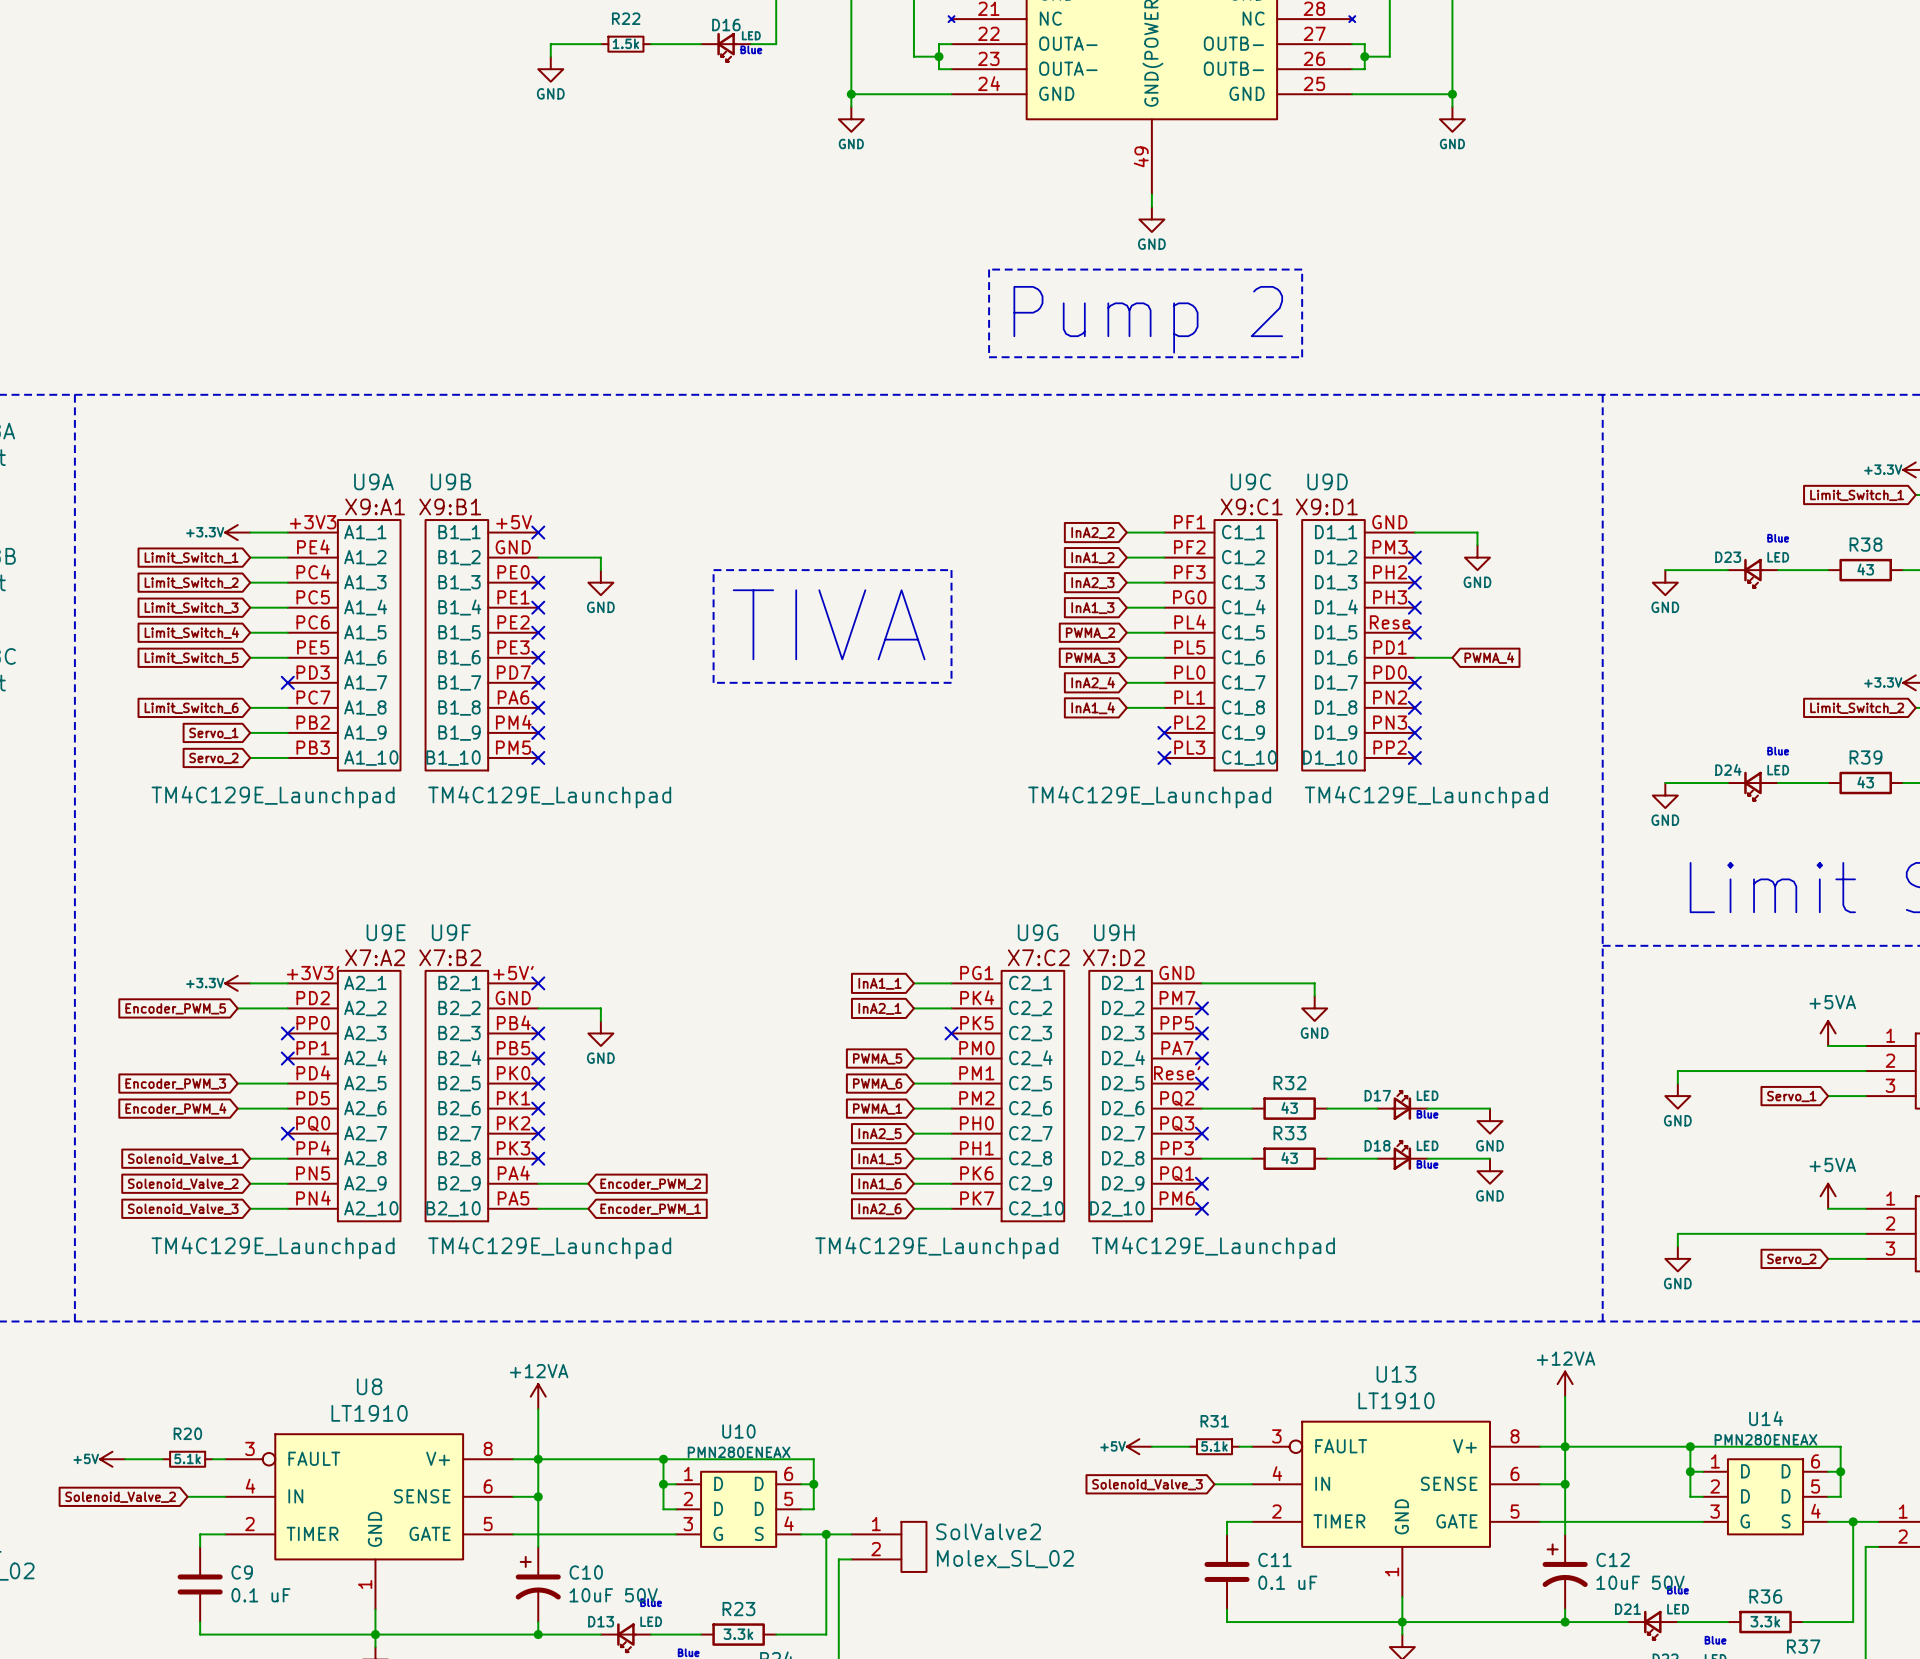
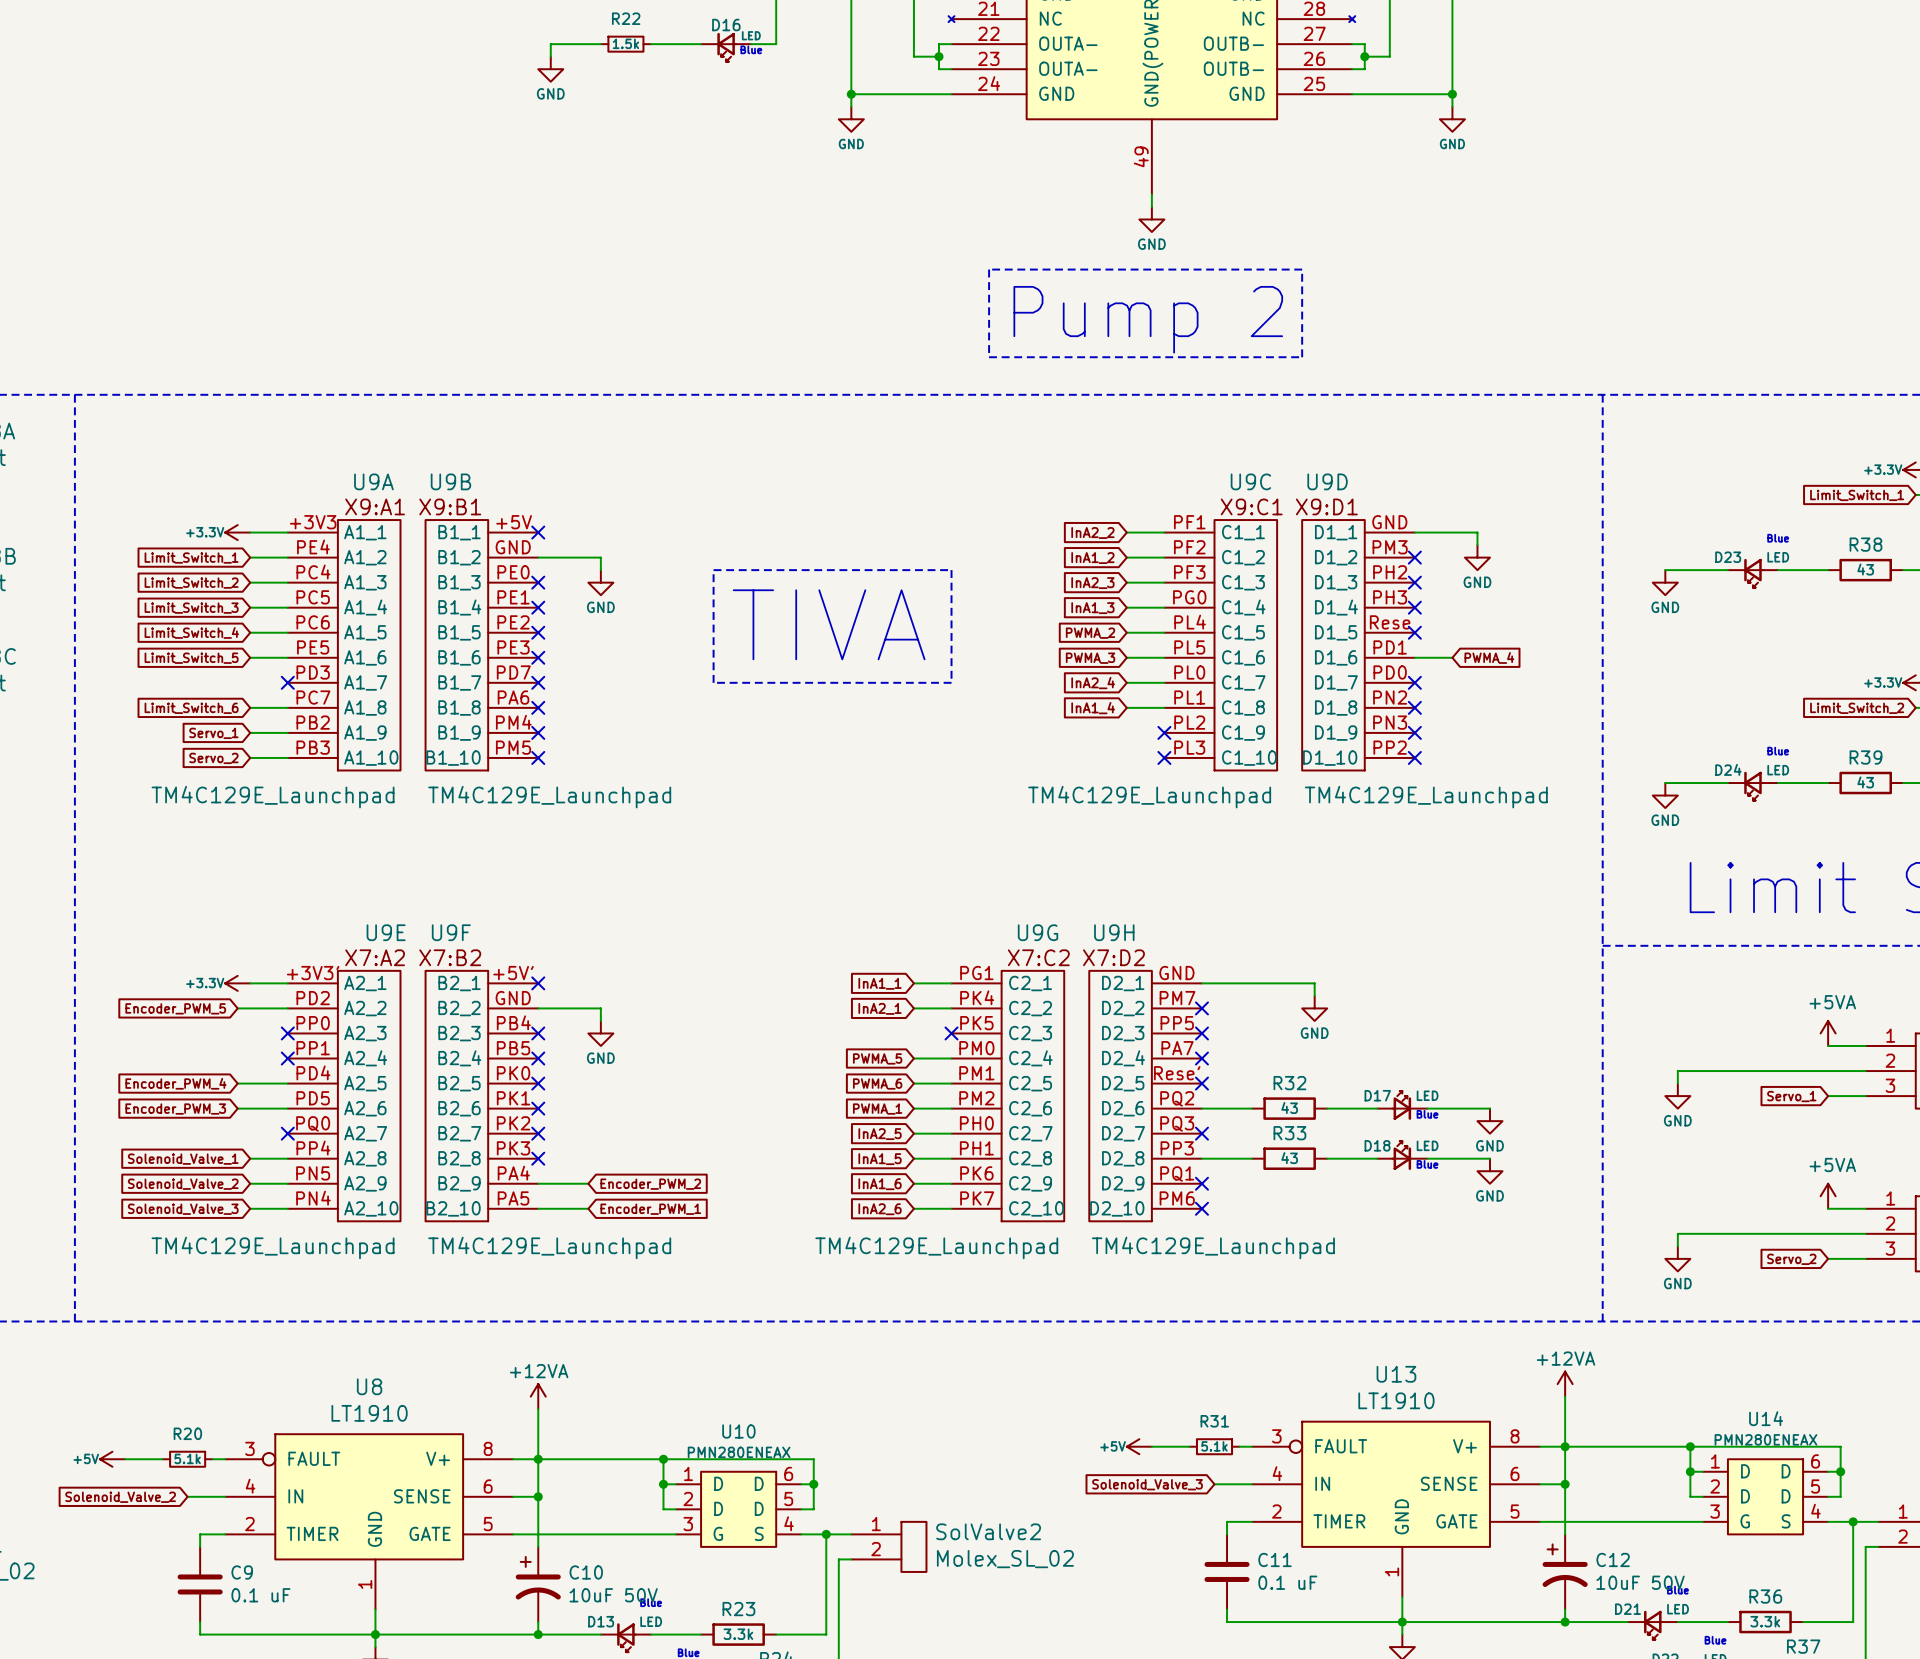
global label: Encoder_PWM_3 (175, 1083) -> Encoder_PWM_4 (175, 1083)
global label: Encoder_PWM_4 (175, 1108) -> Encoder_PWM_3 (175, 1109)

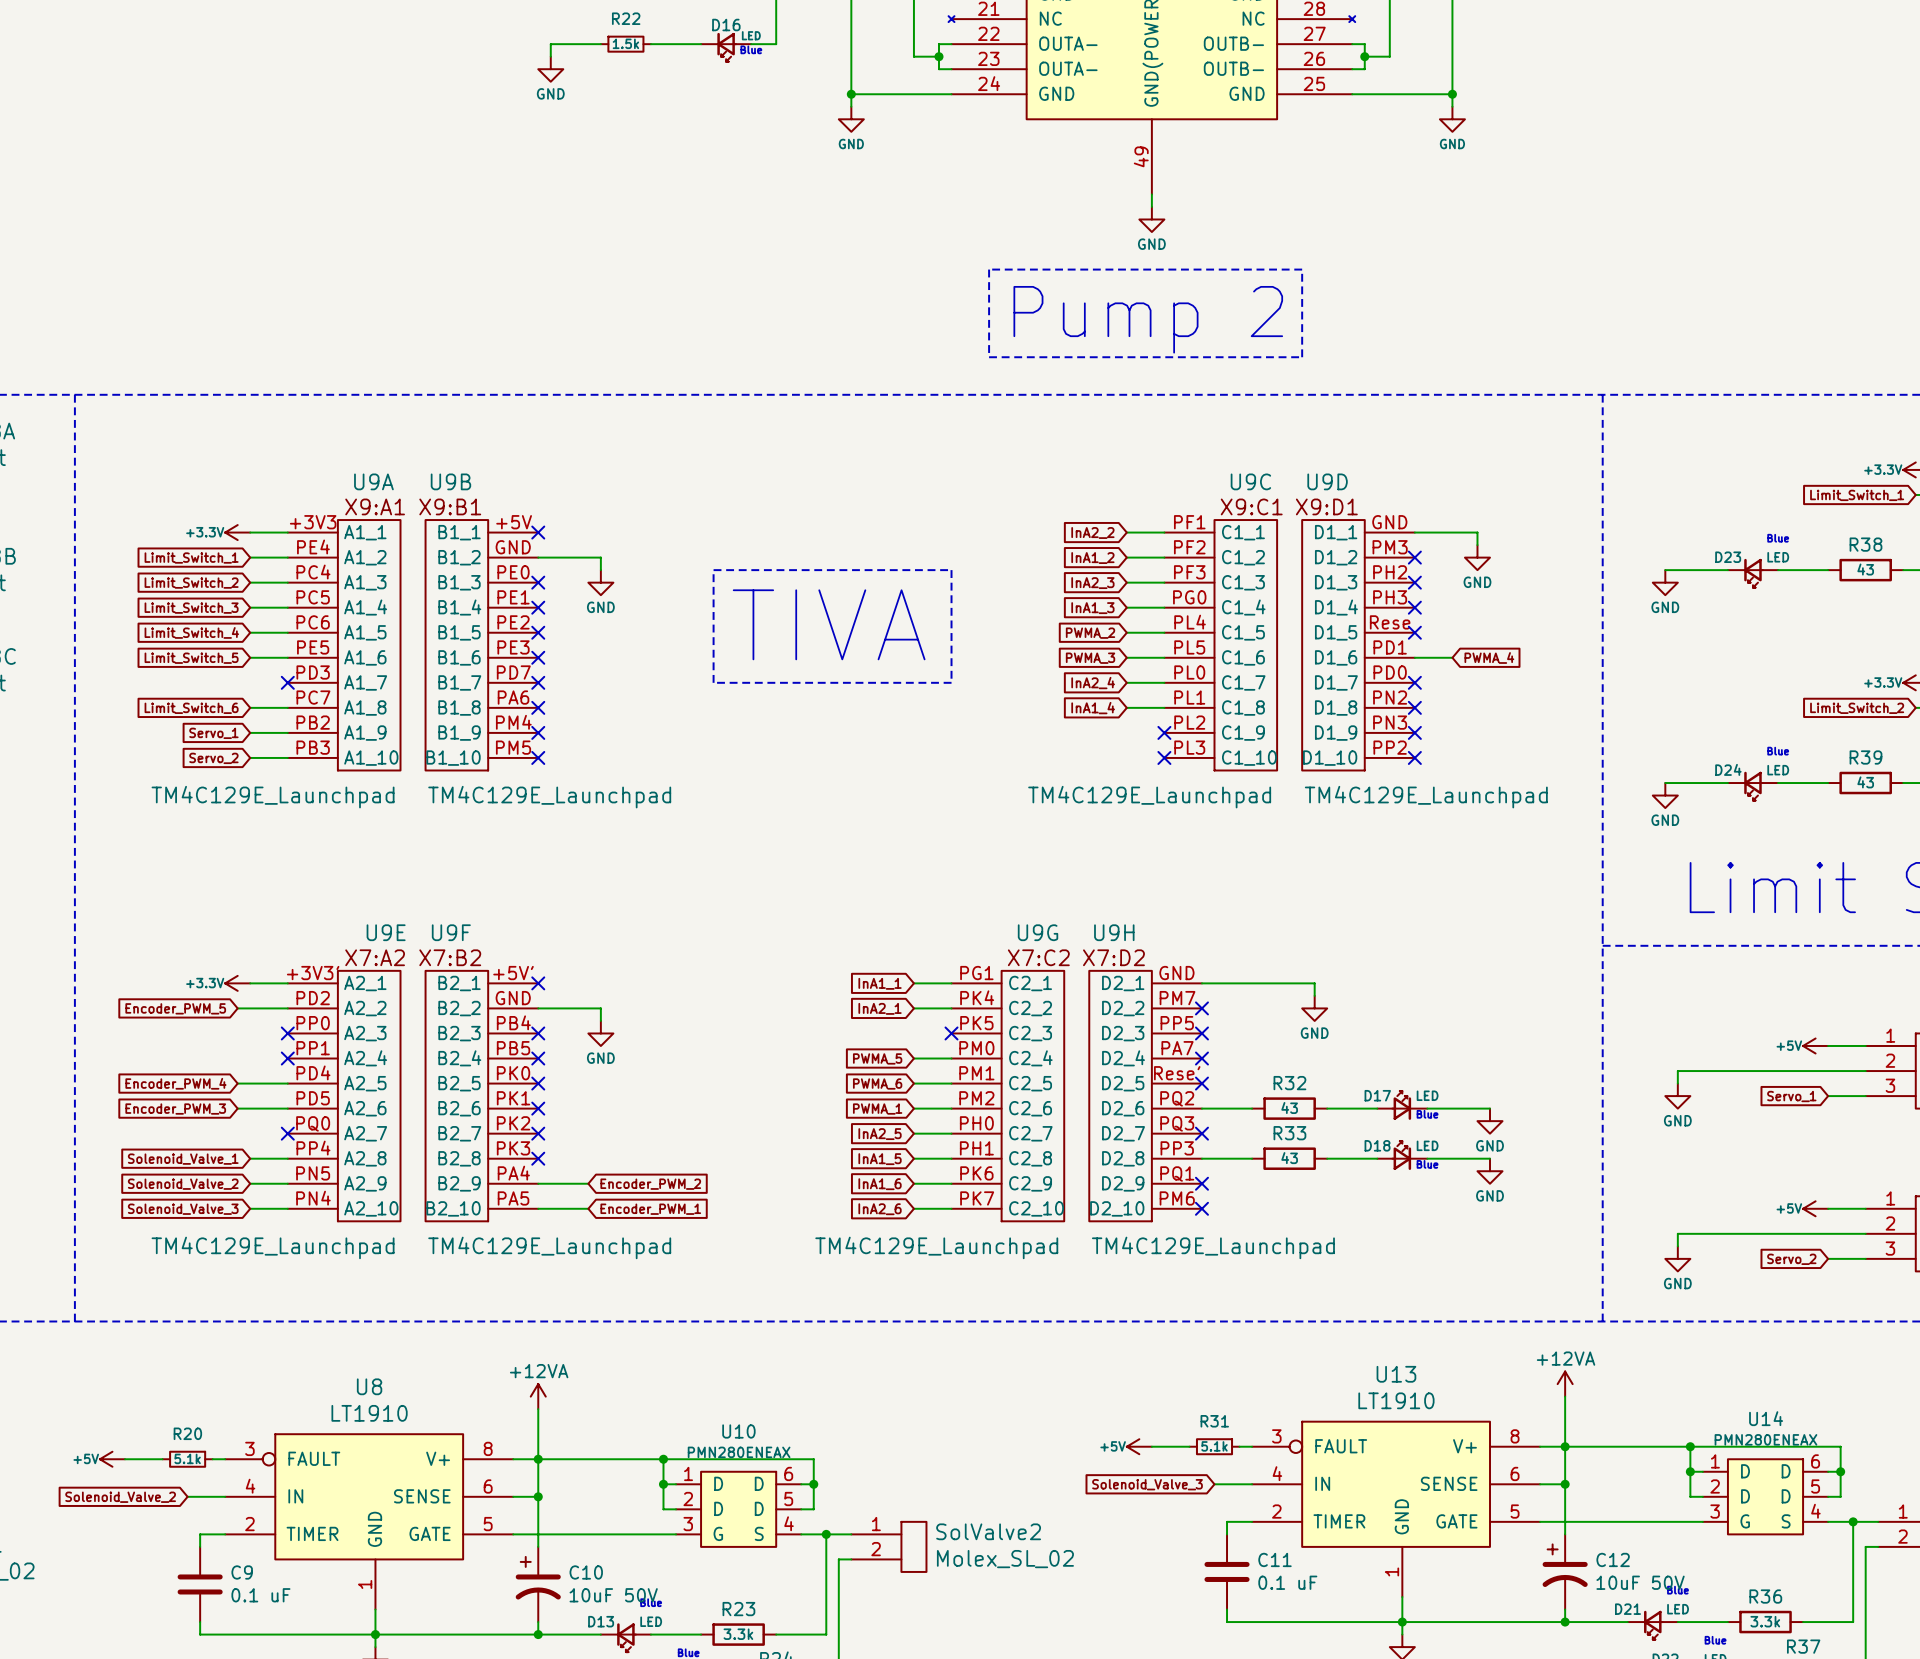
power symbol: +5VA (1828, 1033) -> none
power symbol: none -> +5V (1815, 1045)
power symbol: +5VA (1828, 1196) -> none
power symbol: none -> +5V (1815, 1208)

